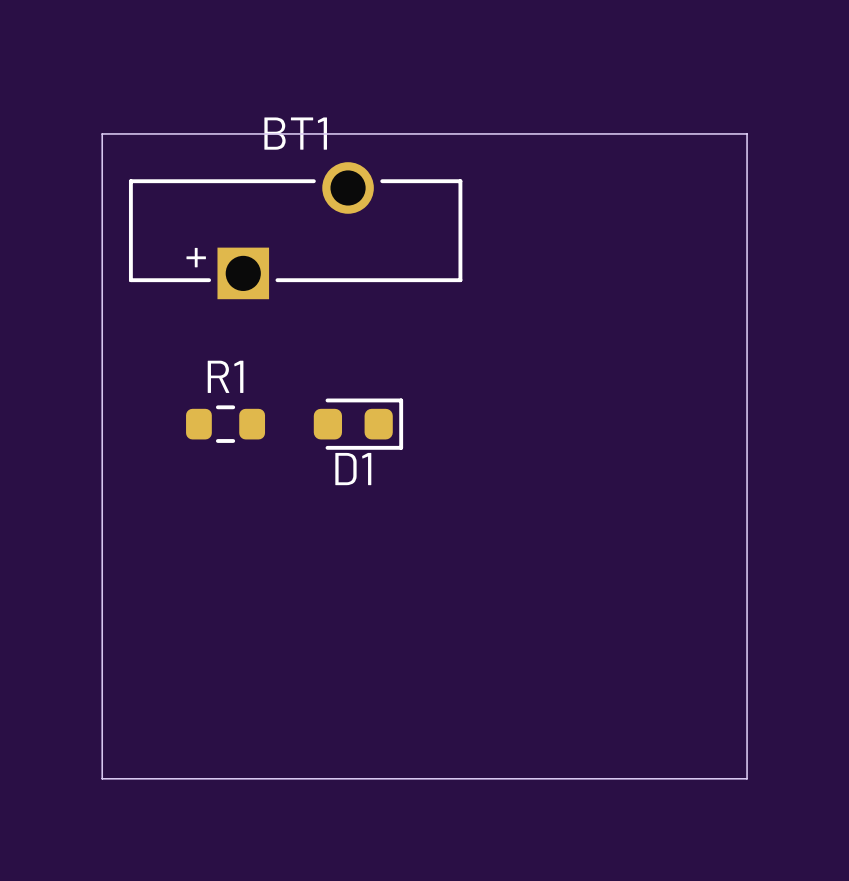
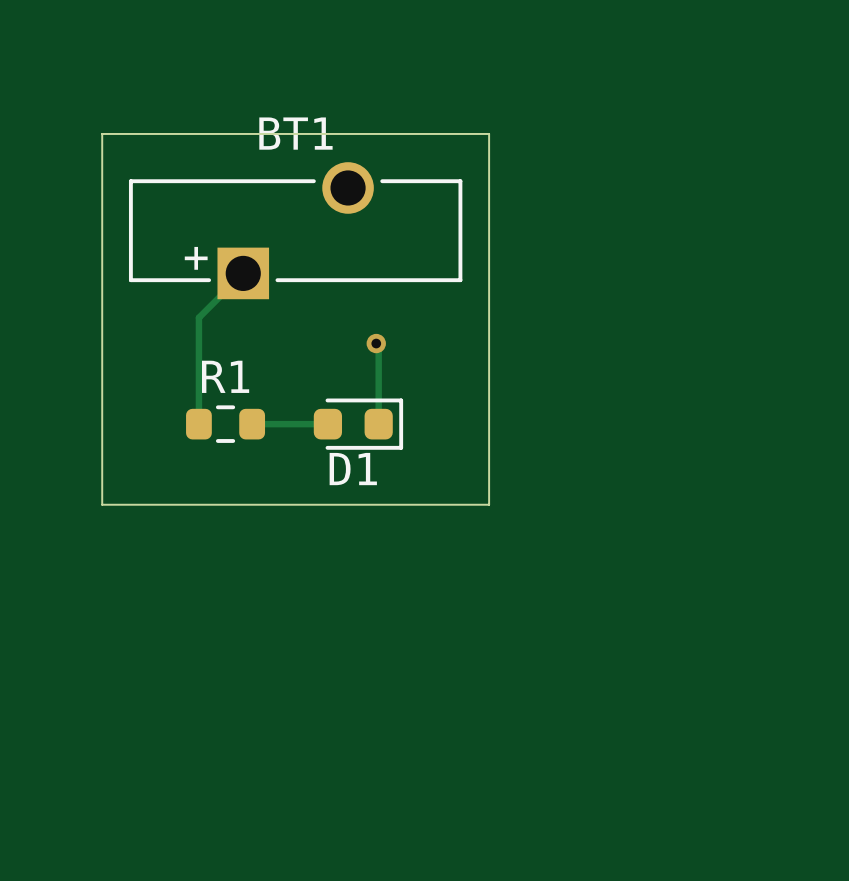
board edge: (489, 133) (747, 133) (747, 778) (102, 778) (102, 504) -> (489, 133) (489, 504) (102, 504)
track: none -> (243, 273) (198, 317) (198, 424)
track: none -> (376, 343) (378, 345) (378, 424)
via: none -> (376, 343)
track: none -> (252, 424) (327, 424)

